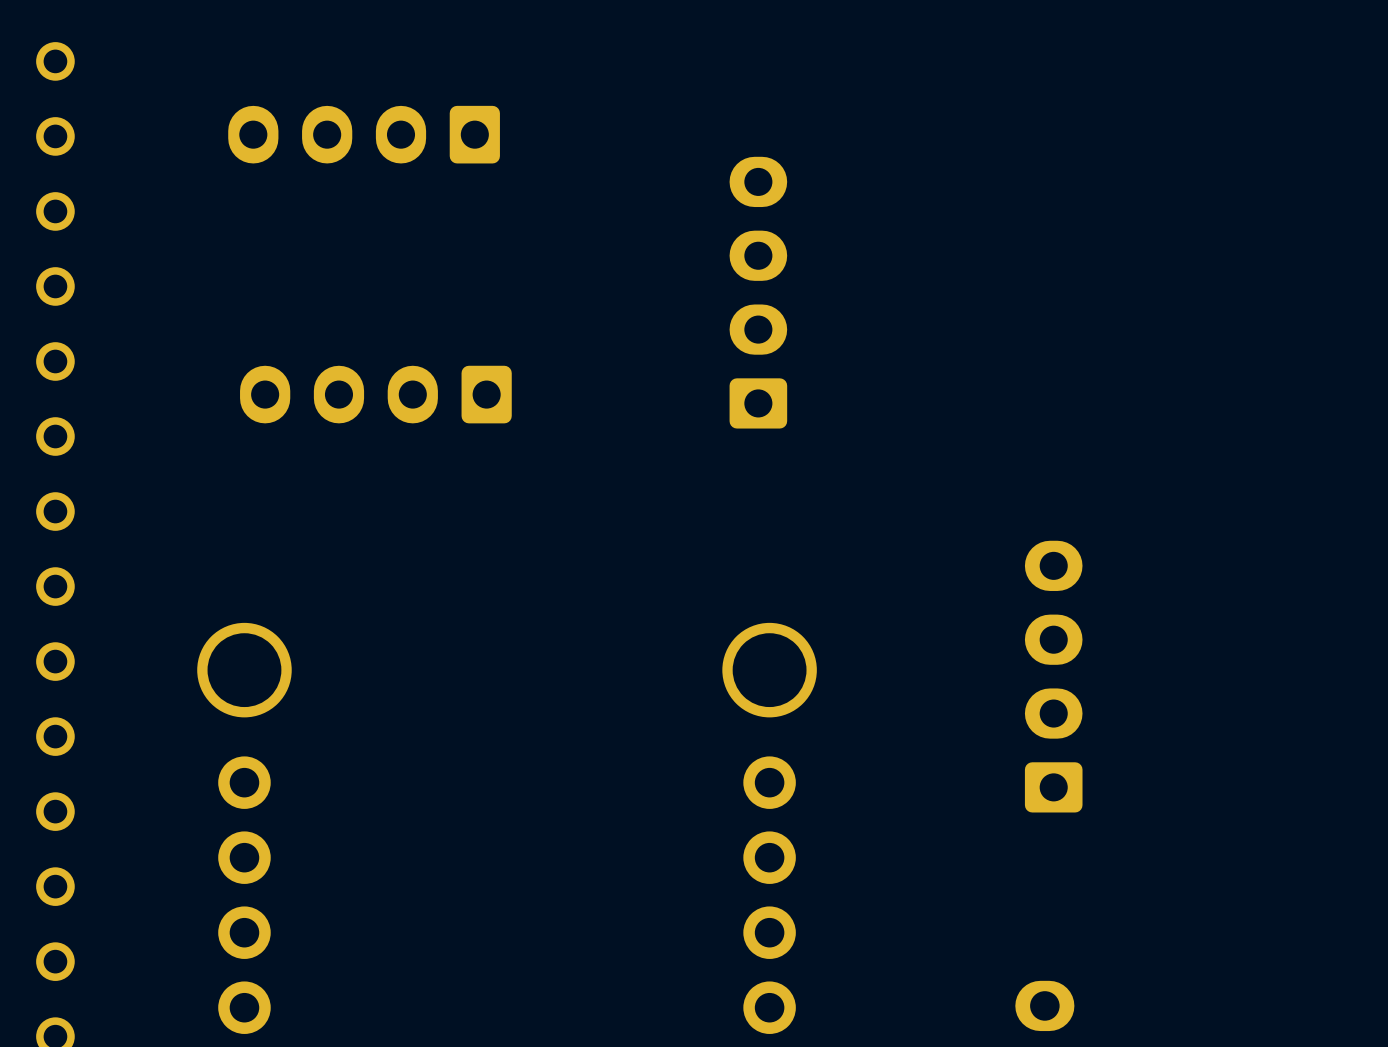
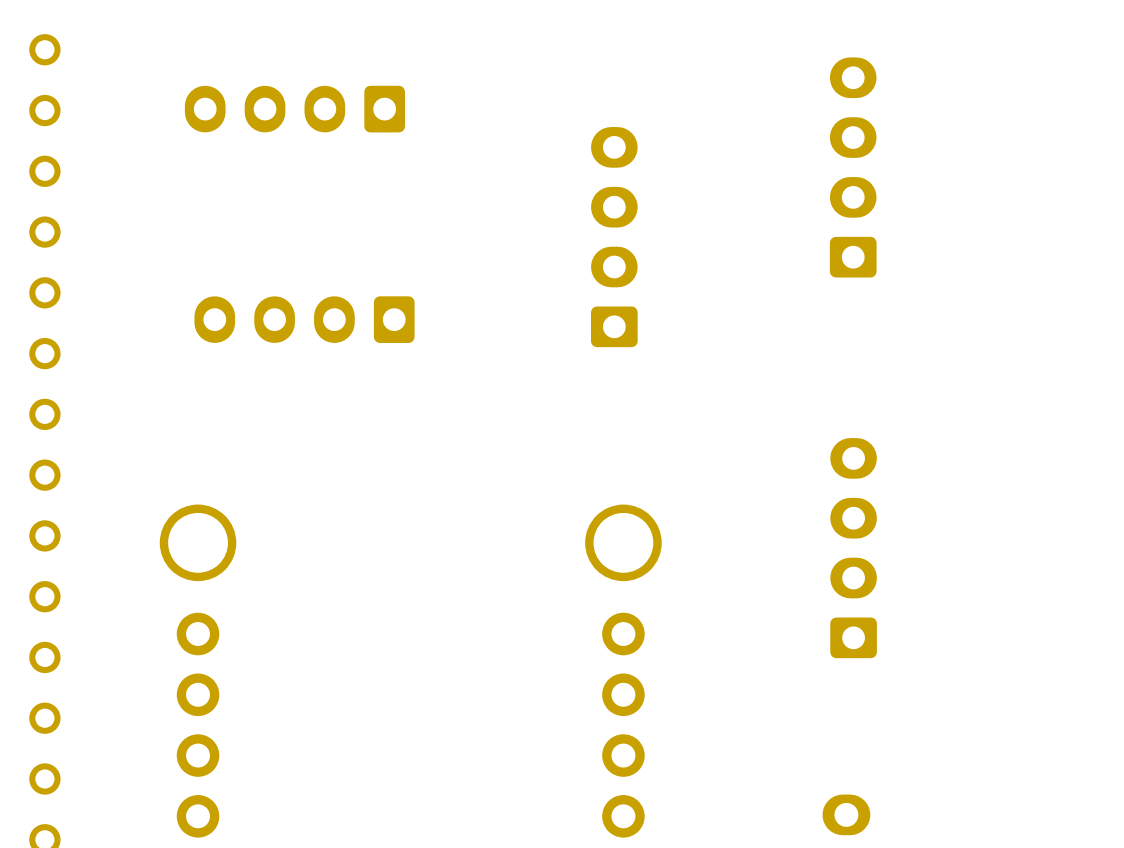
part: none -> (853, 167)

